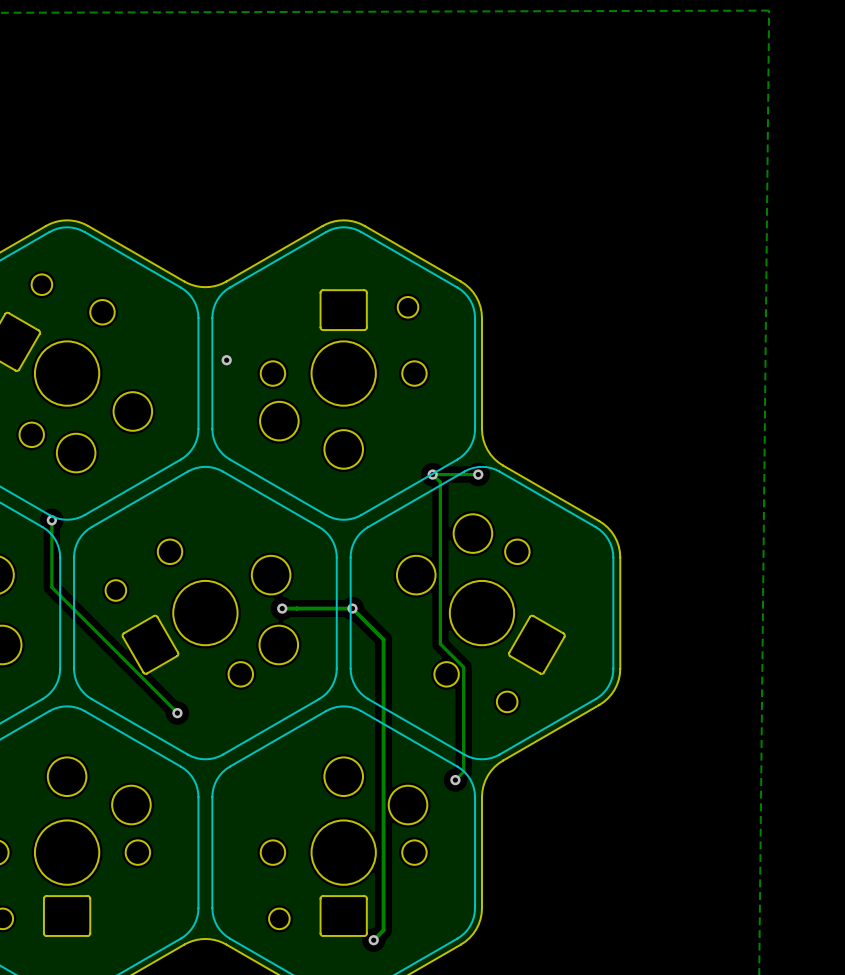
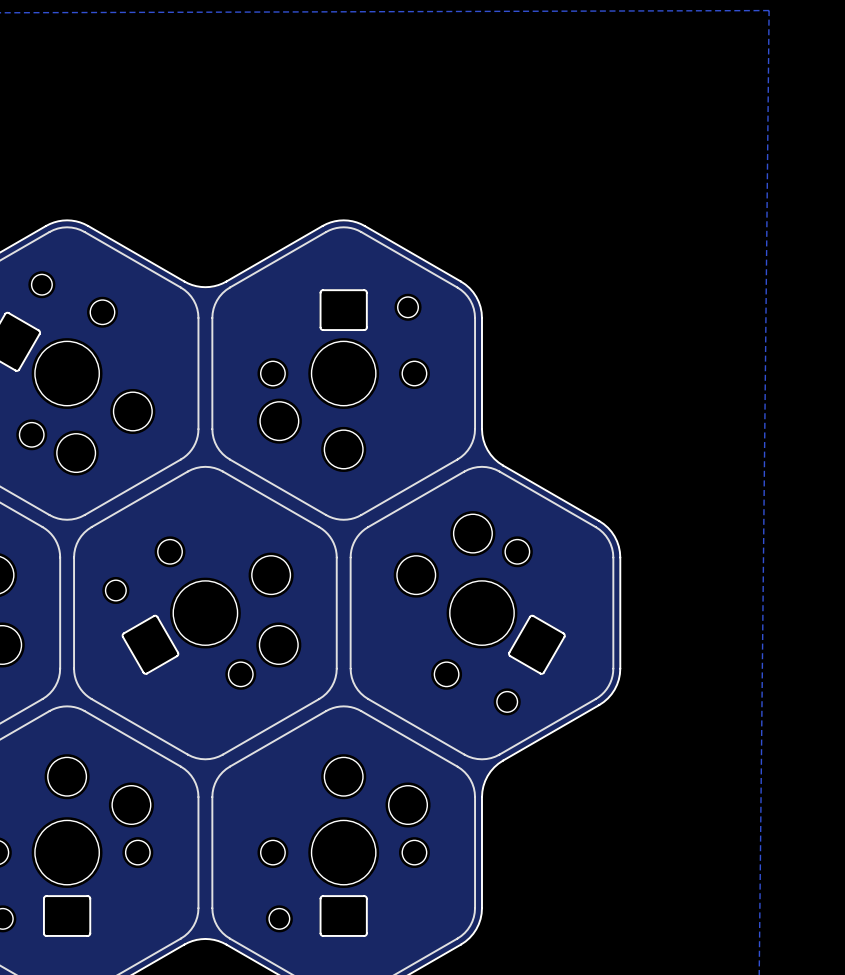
via: (226, 360) -> none
via: (432, 474) -> none
track: (478, 474) (432, 474) (440, 482) (440, 644) (463, 667) (463, 771) (455, 780) -> none
via: (478, 474) -> none
track: (51, 520) (51, 587) (177, 712) -> none
via: (51, 520) -> none
track: (282, 608) (352, 608) (383, 639) (383, 930) (373, 940) -> none
via: (282, 608) -> none
via: (352, 608) -> none
via: (177, 713) -> none
via: (455, 780) -> none
via: (373, 940) -> none

